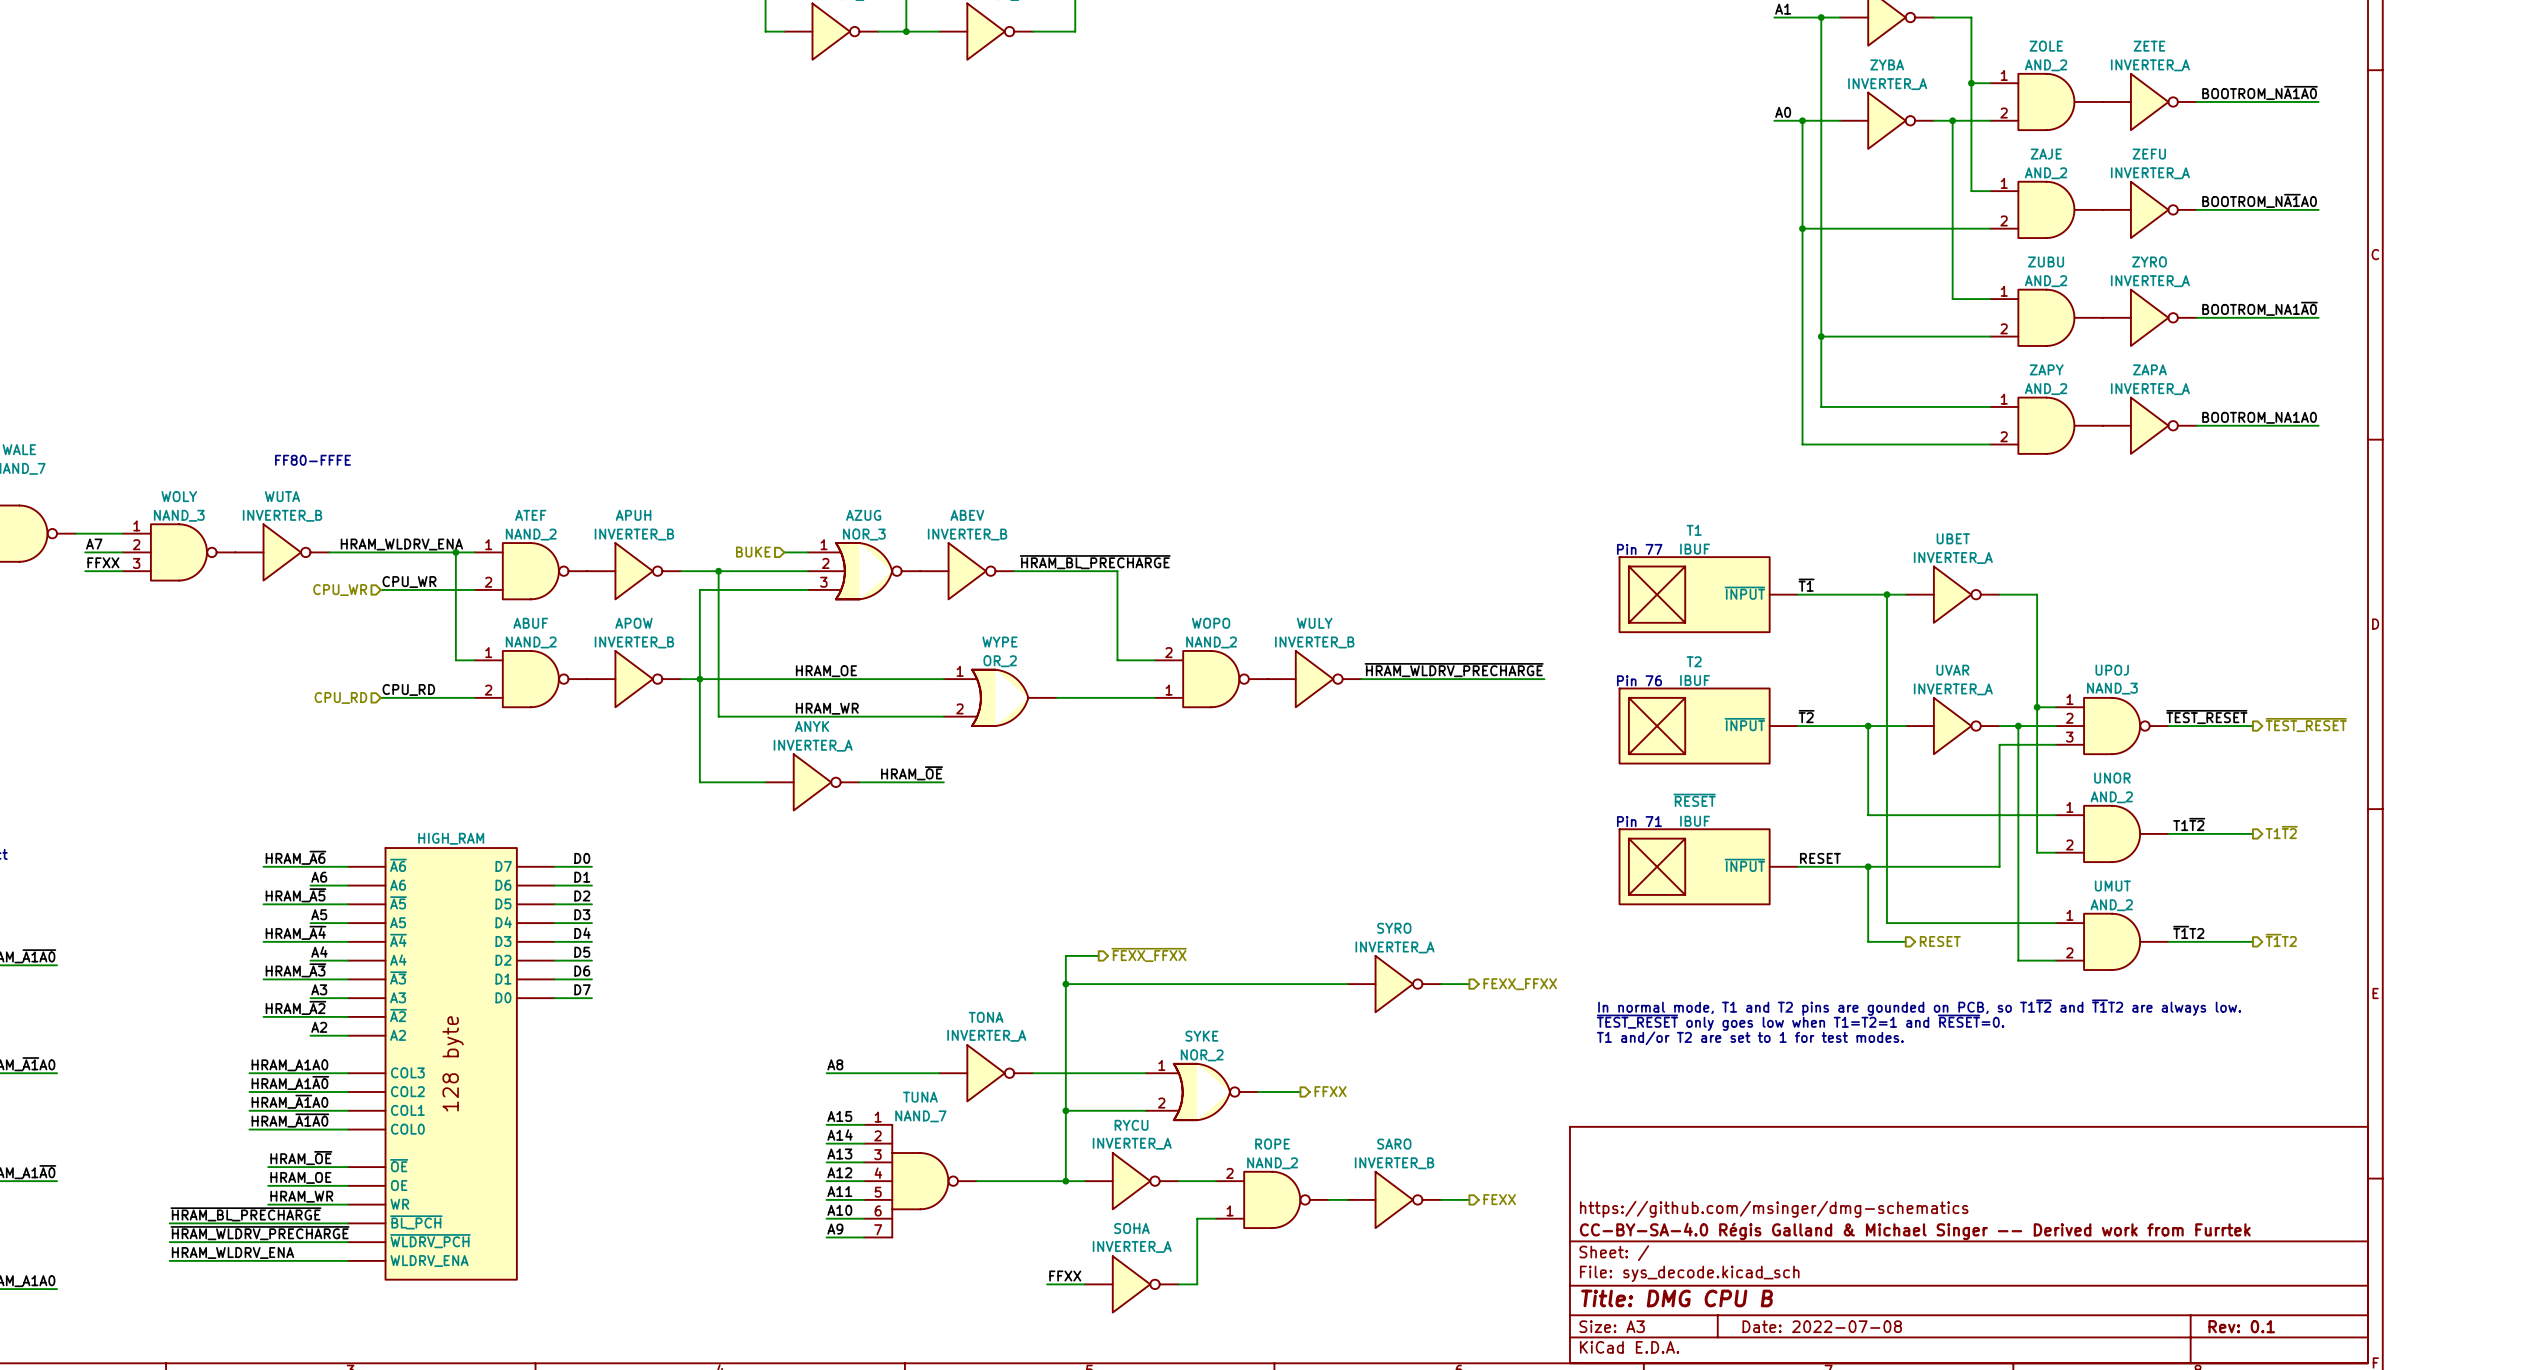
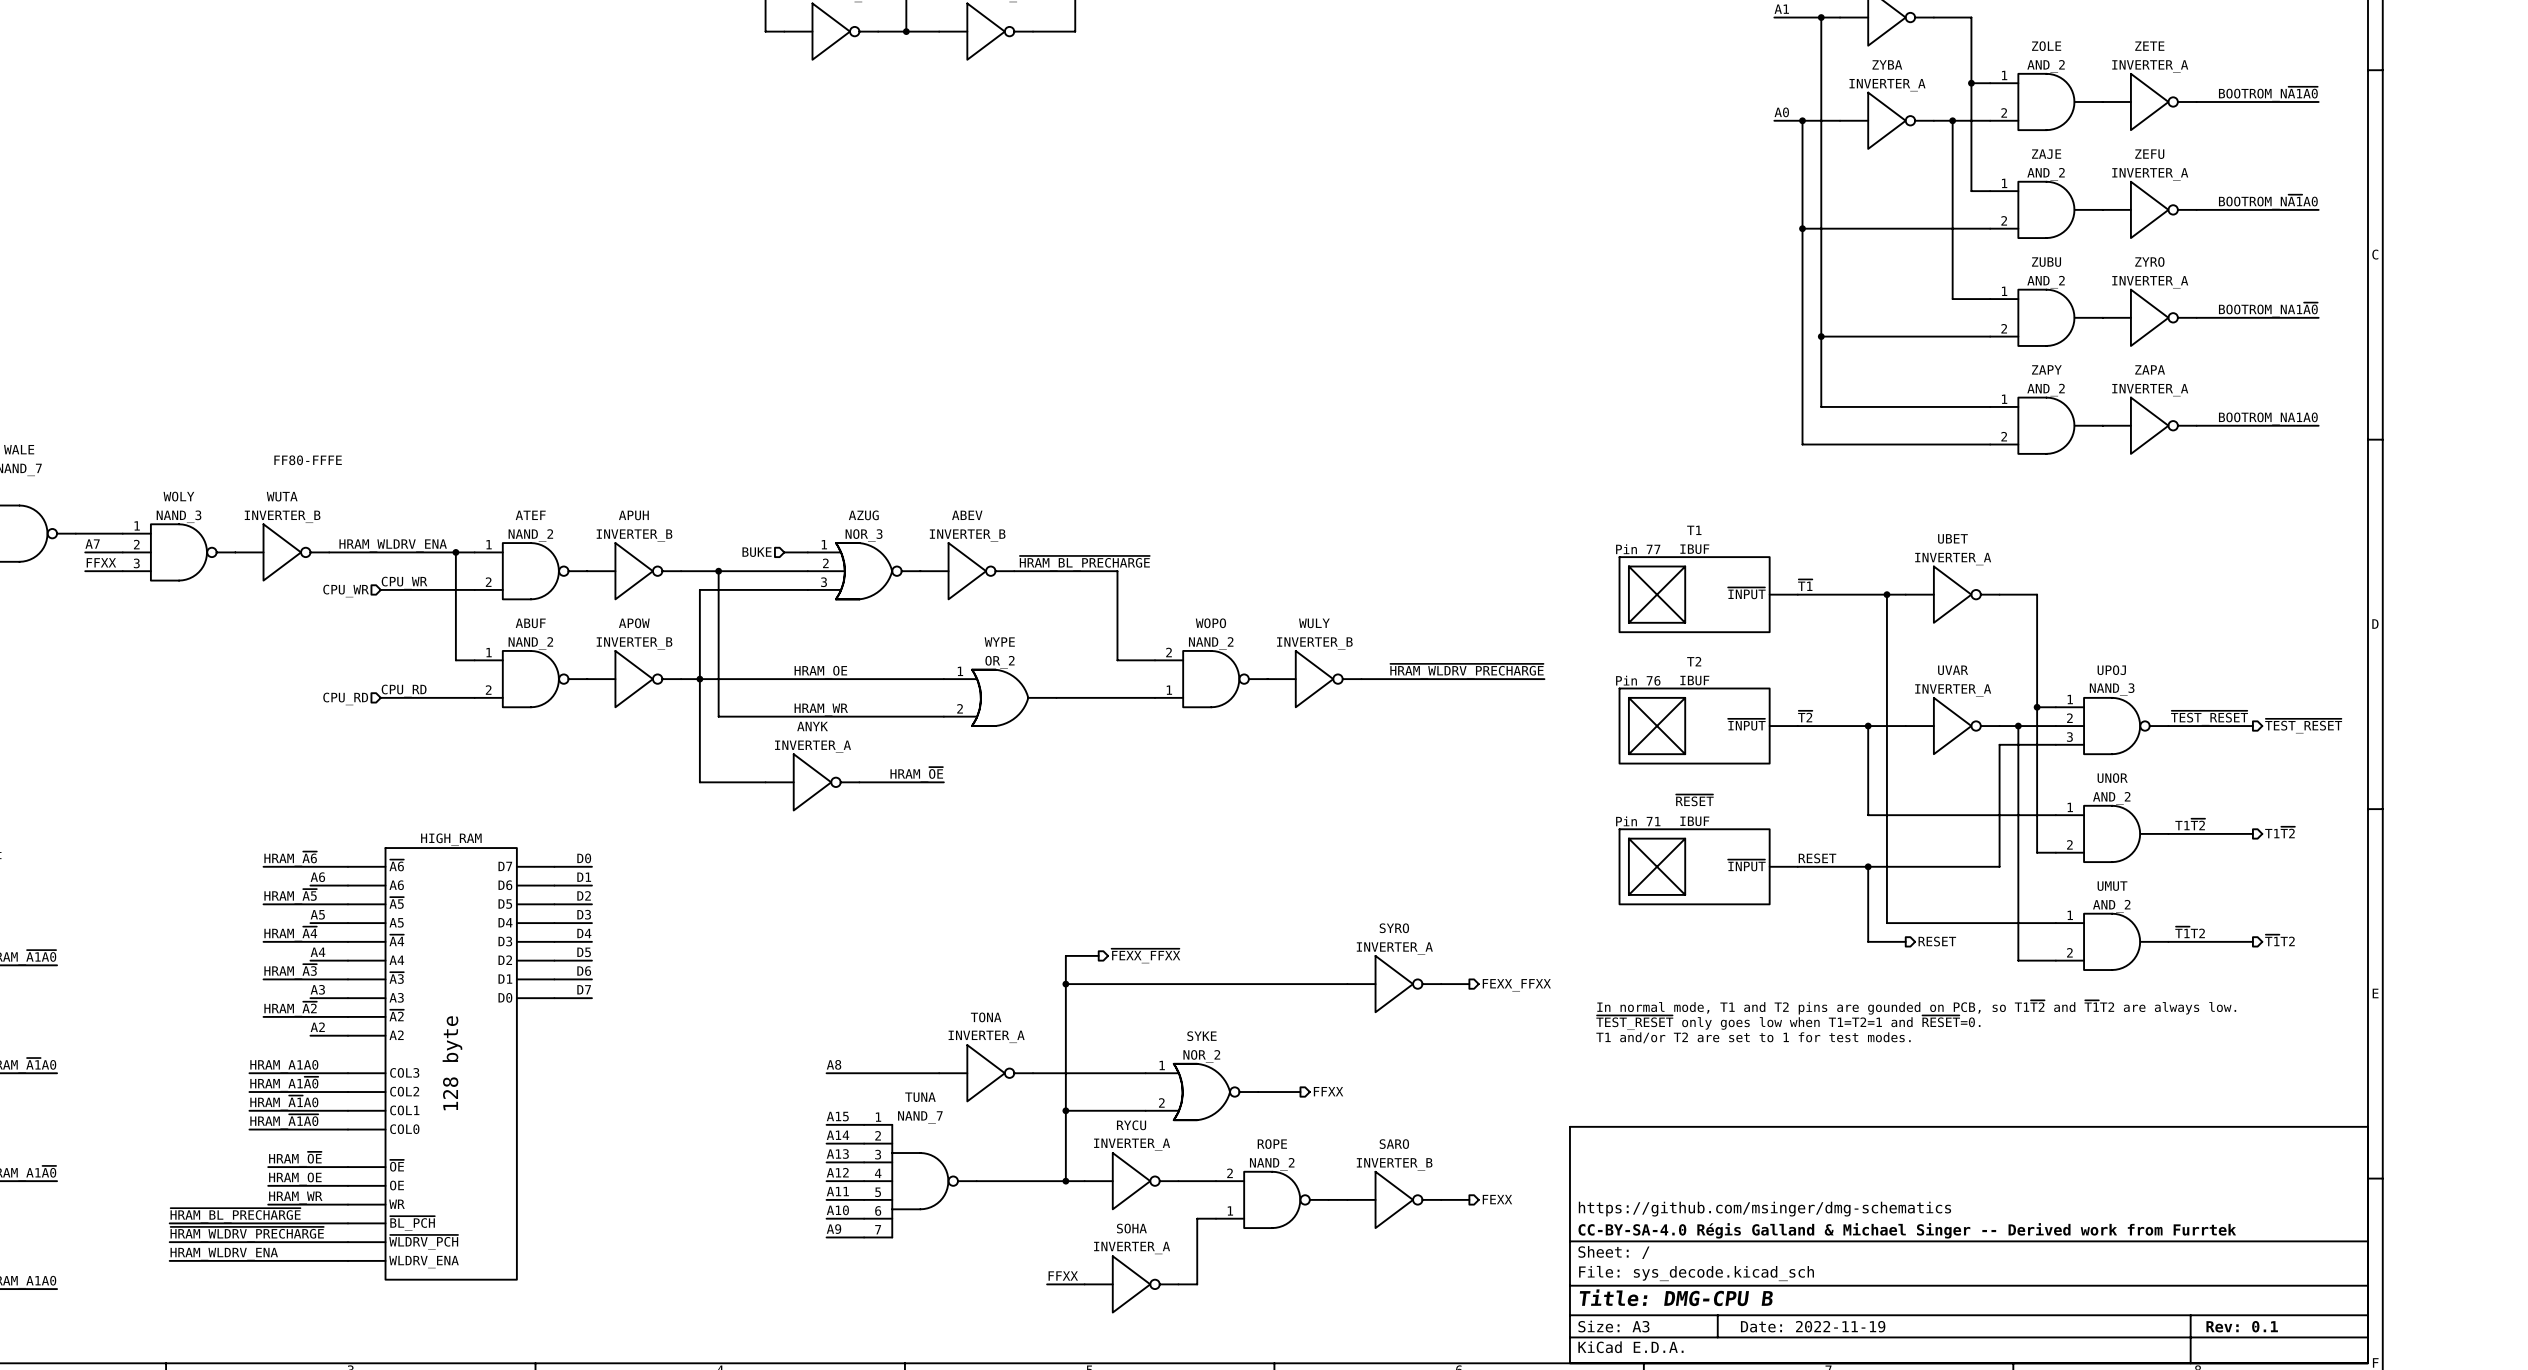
title block: Title: DMG CPU B (1677, 1298) -> Title: DMG-CPU B (1676, 1297)
title block: Date: 2022-07-08 (1822, 1326) -> Date: 2022-11-19 (1813, 1326)

